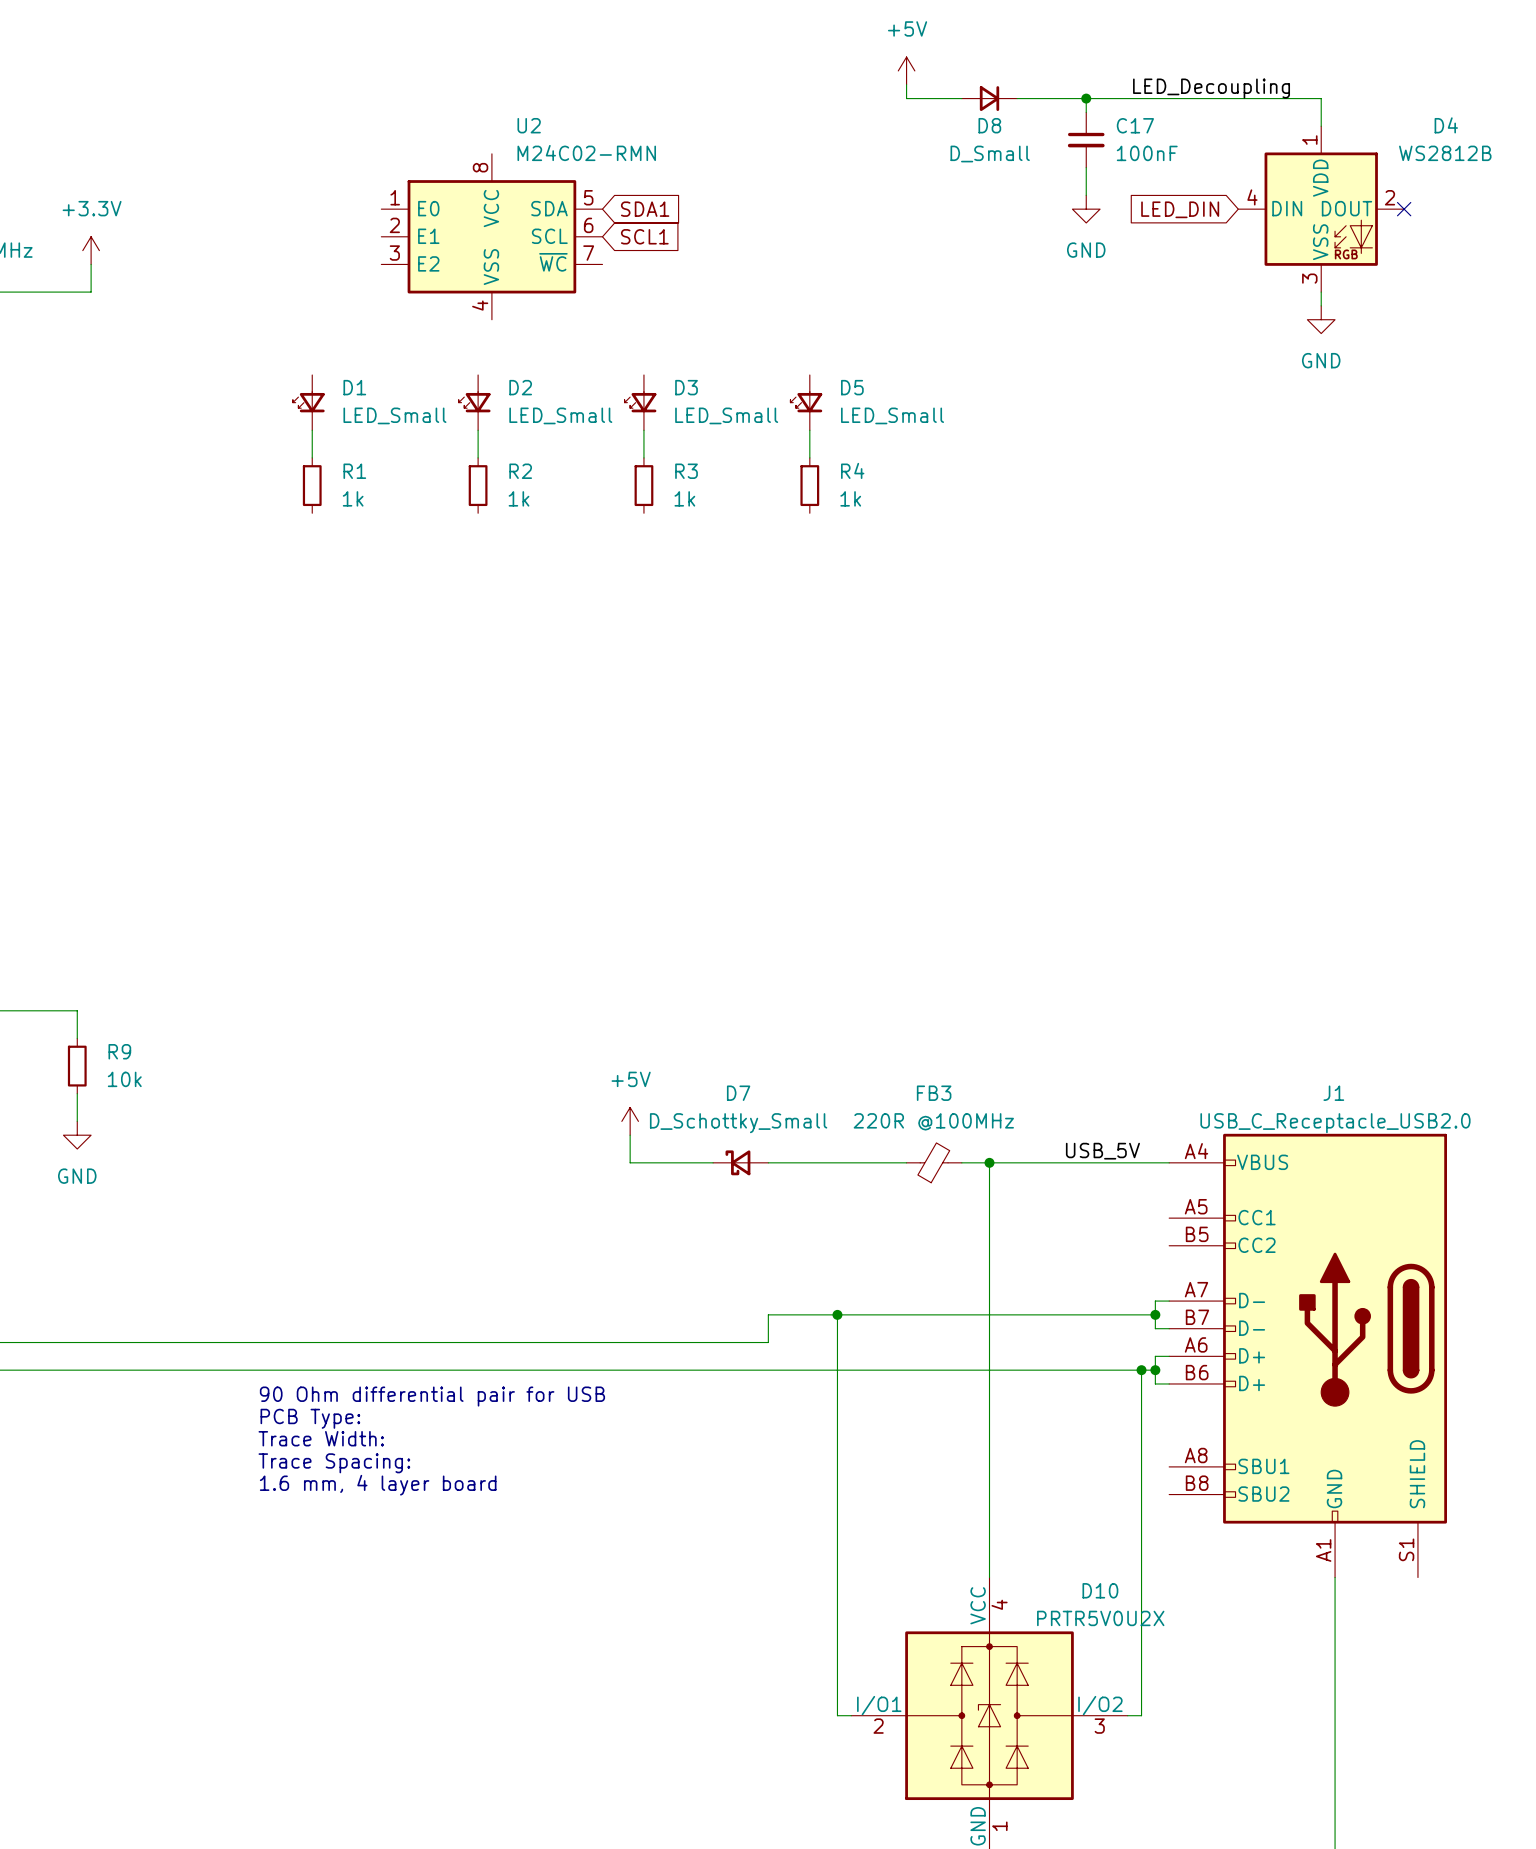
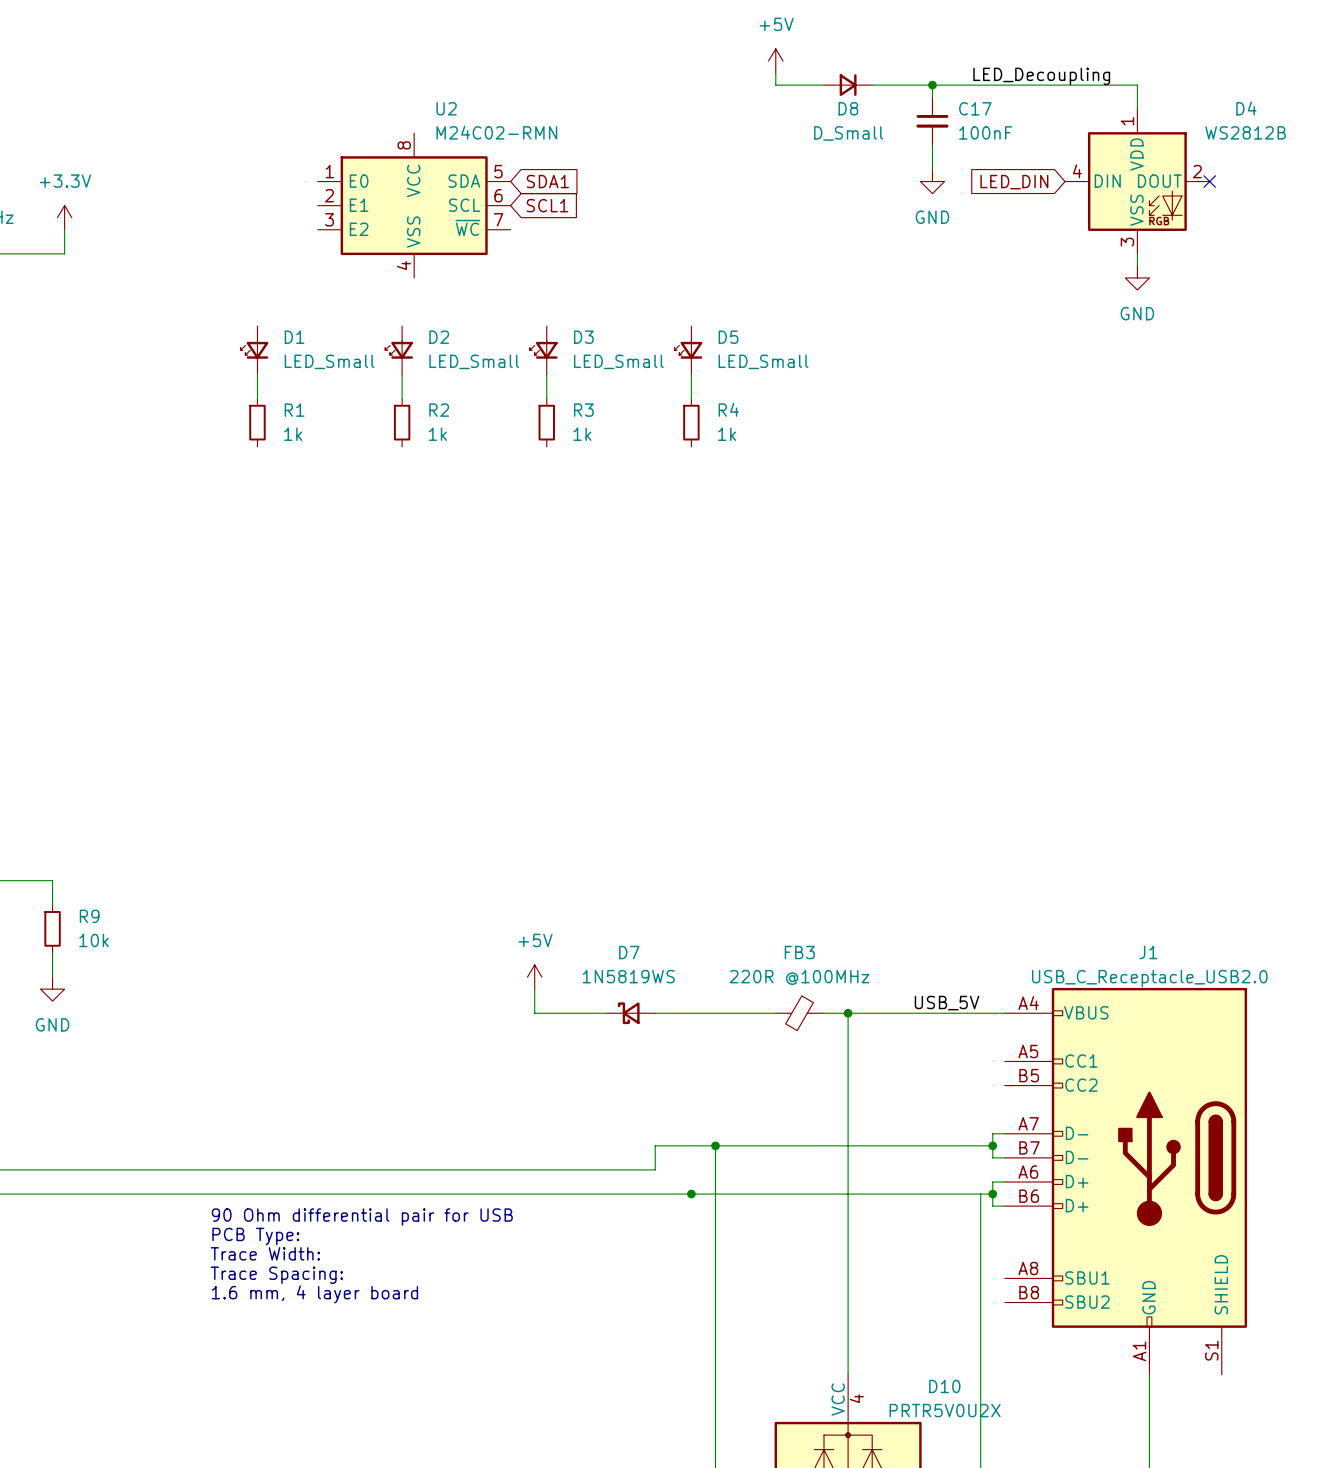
D7 value: D_Schottky_Small (738, 1123) -> 1N5819WS (628, 976)
junction: none -> (691, 1194)
junction: (1141, 1370) -> none

